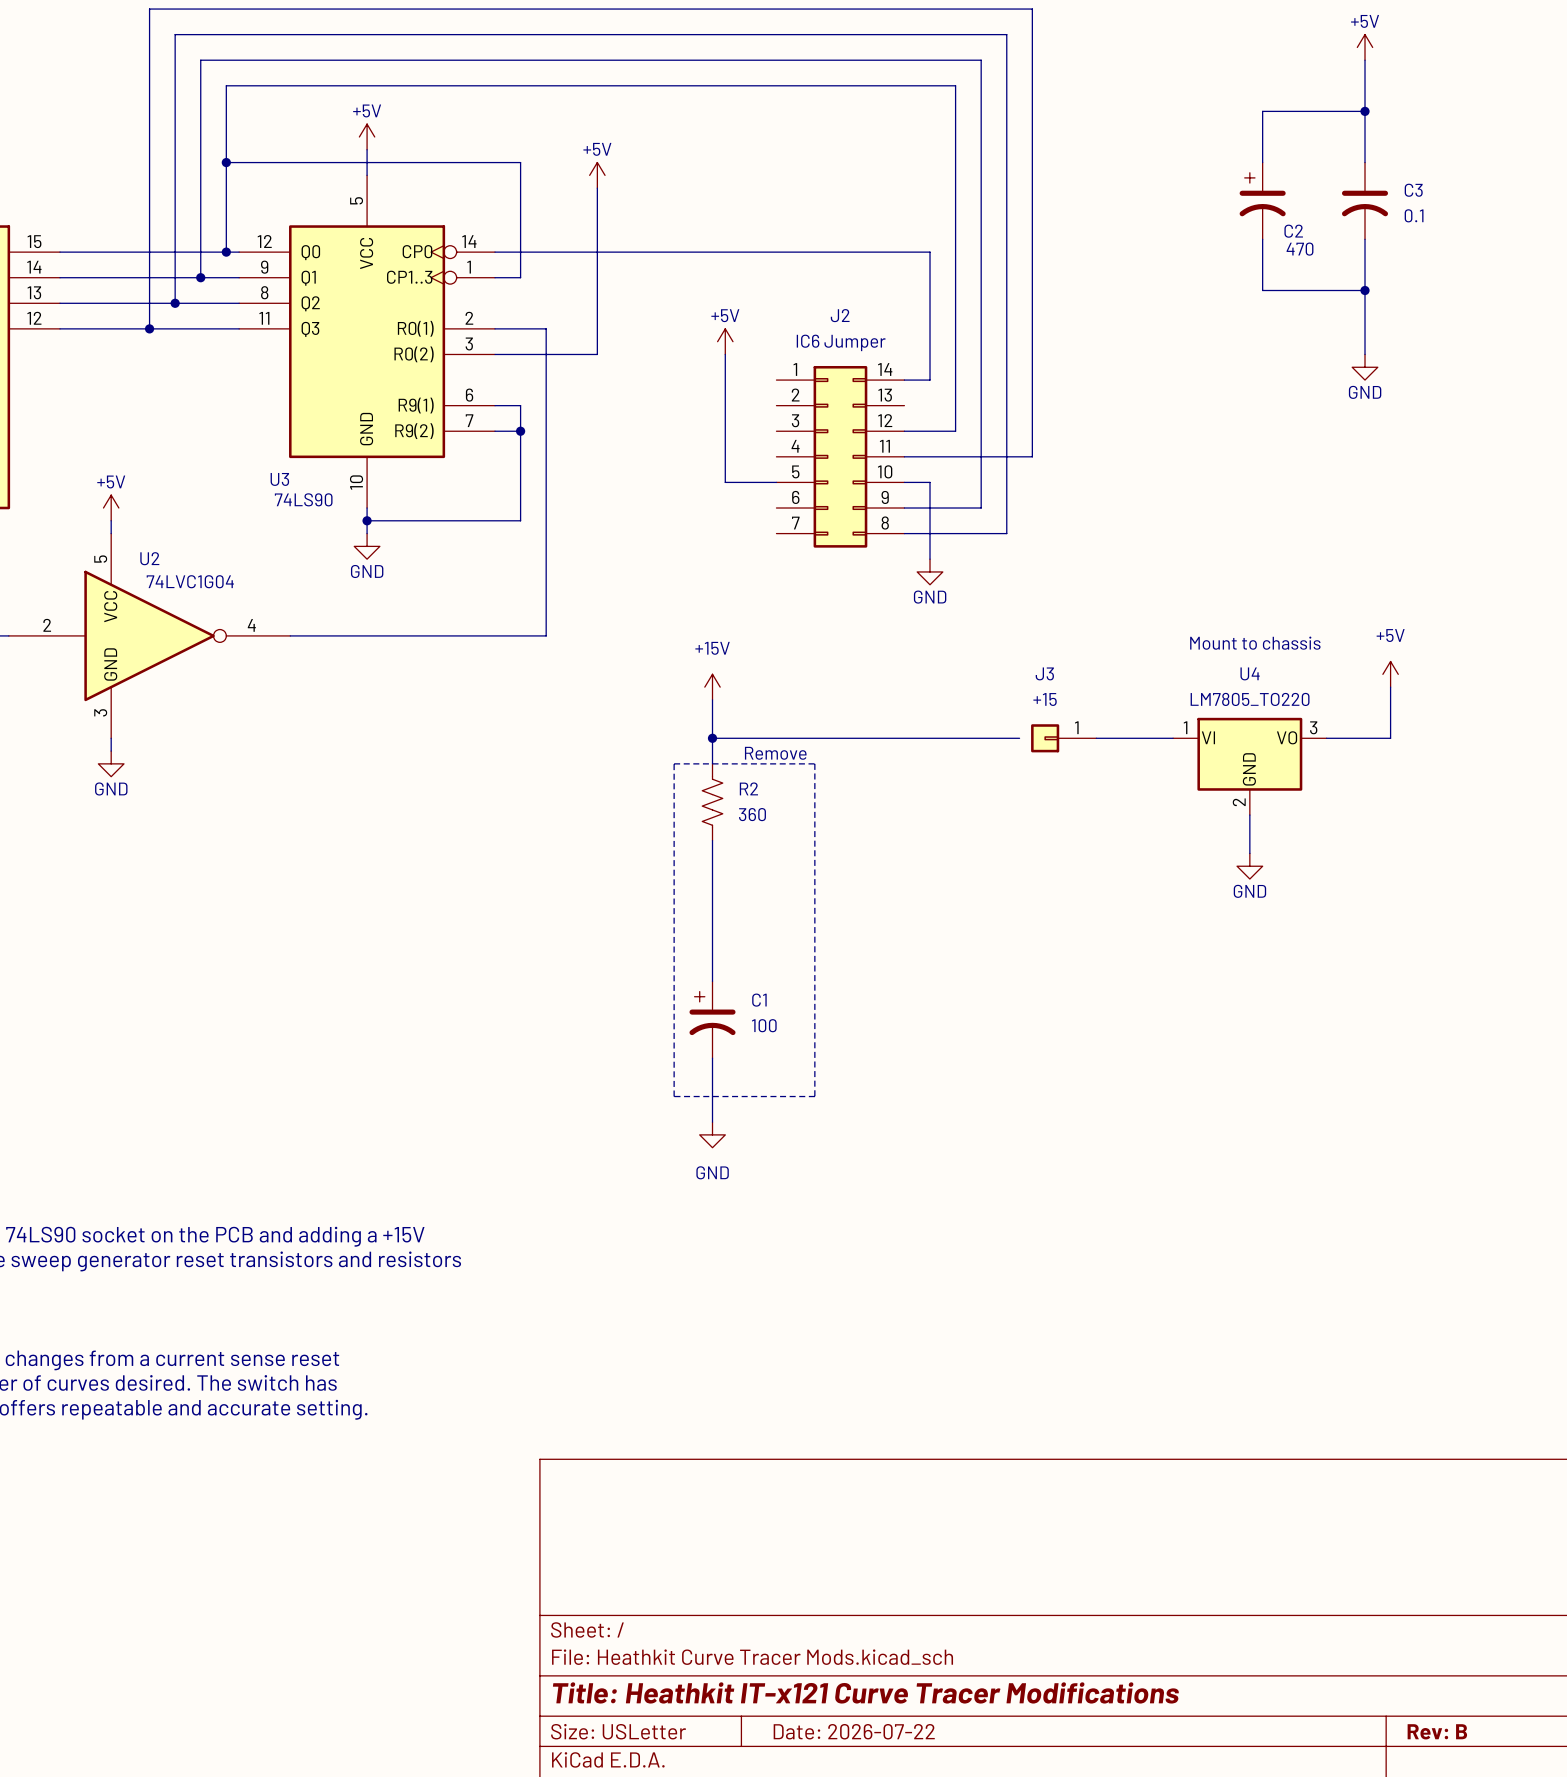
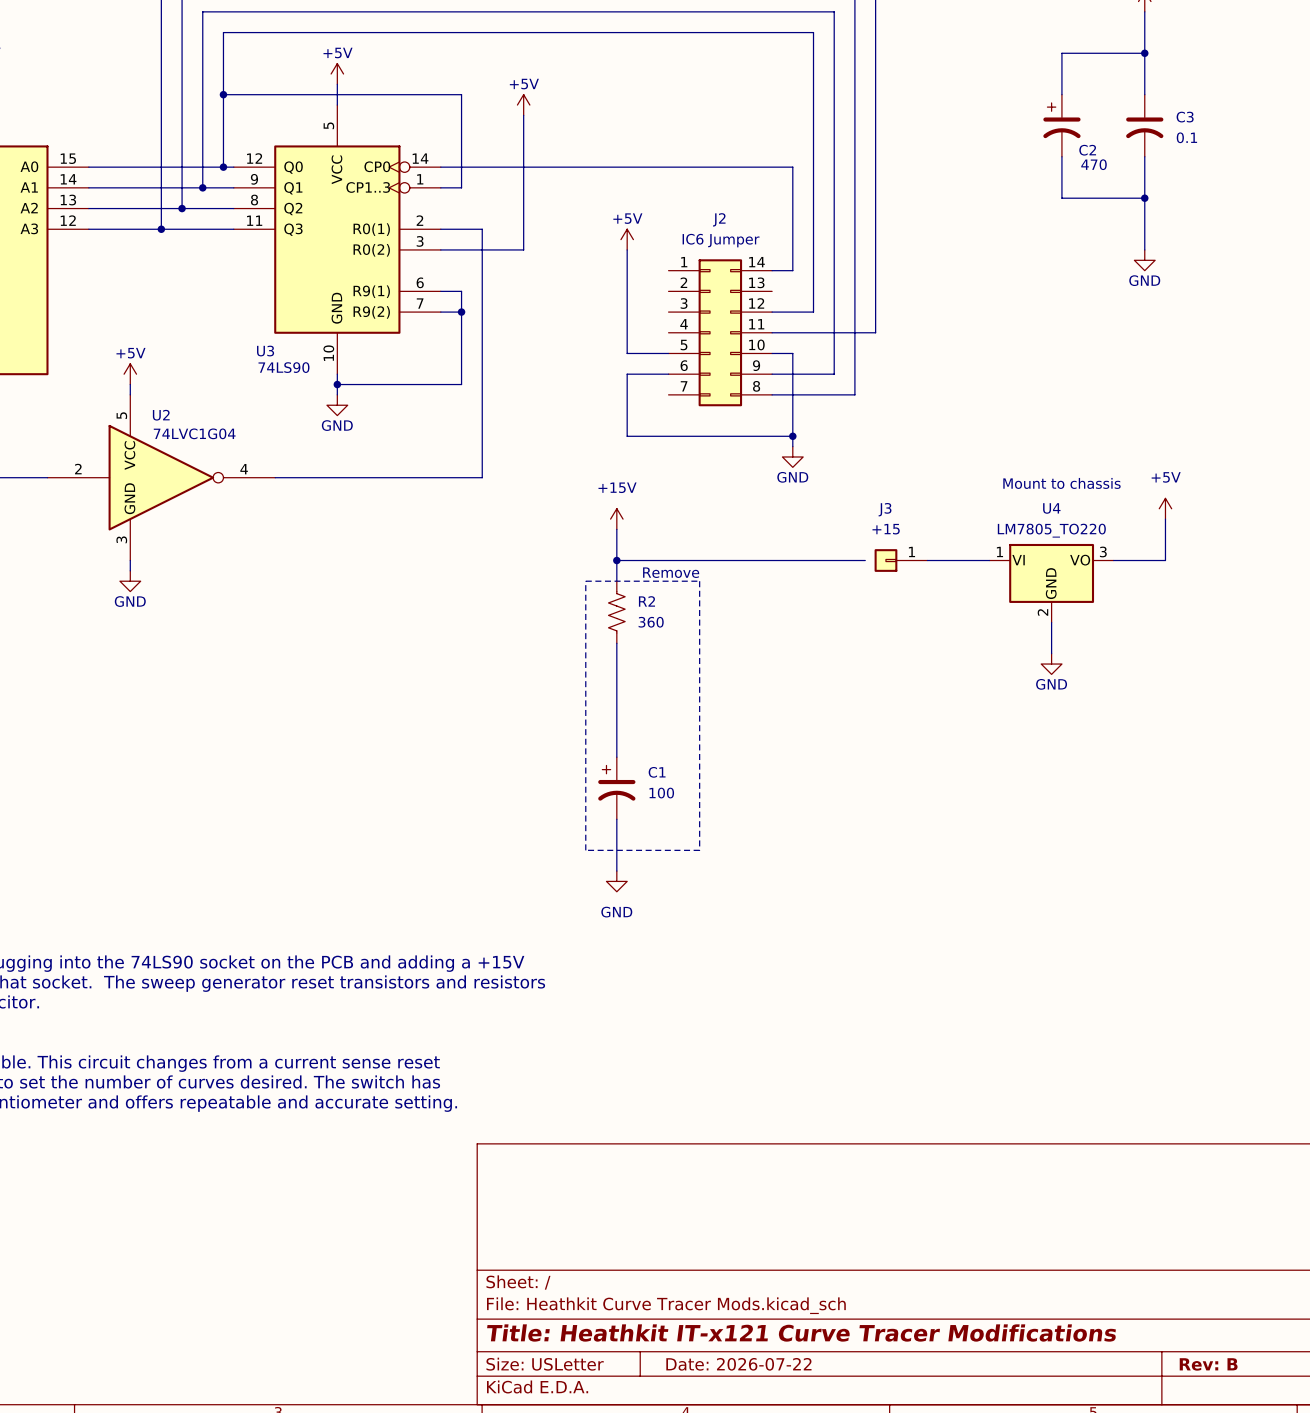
wire: none -> (668, 374) (627, 374) (627, 436) (792, 436)
wire: none -> (792, 415) (792, 446)
power symbol position: GND (930, 571) -> GND (792, 456)
junction: none -> (792, 436)

